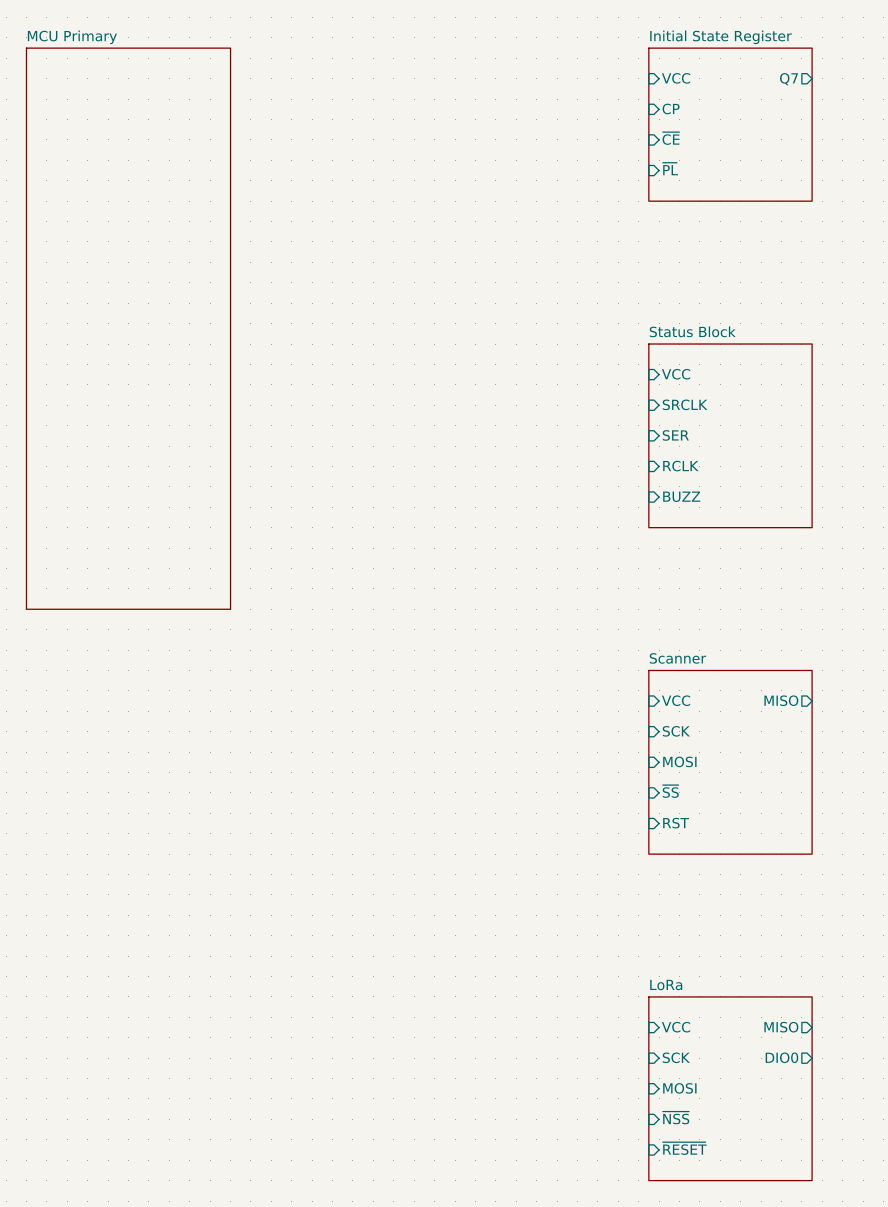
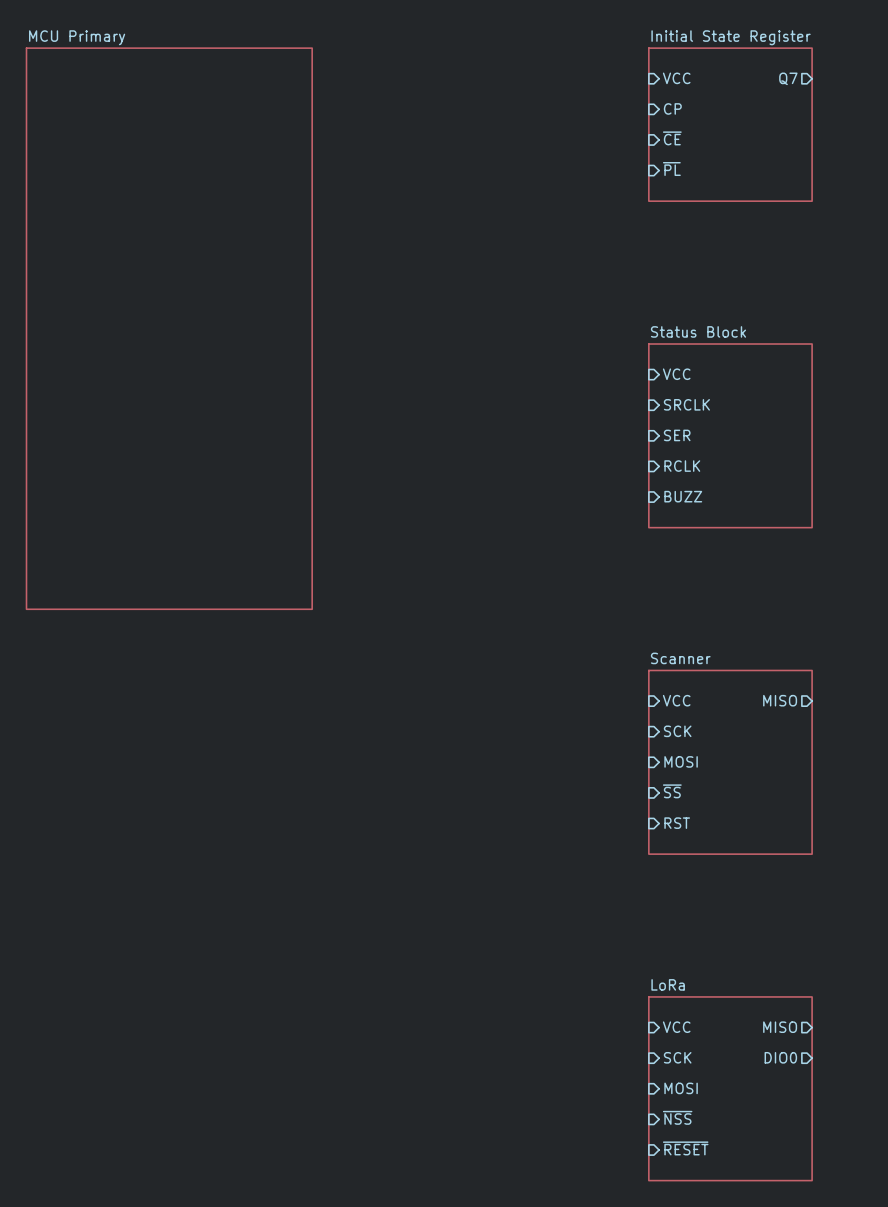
sheet MCU Primary: (128, 328) -> none
sheet MCU Primary: none -> (169, 328)

